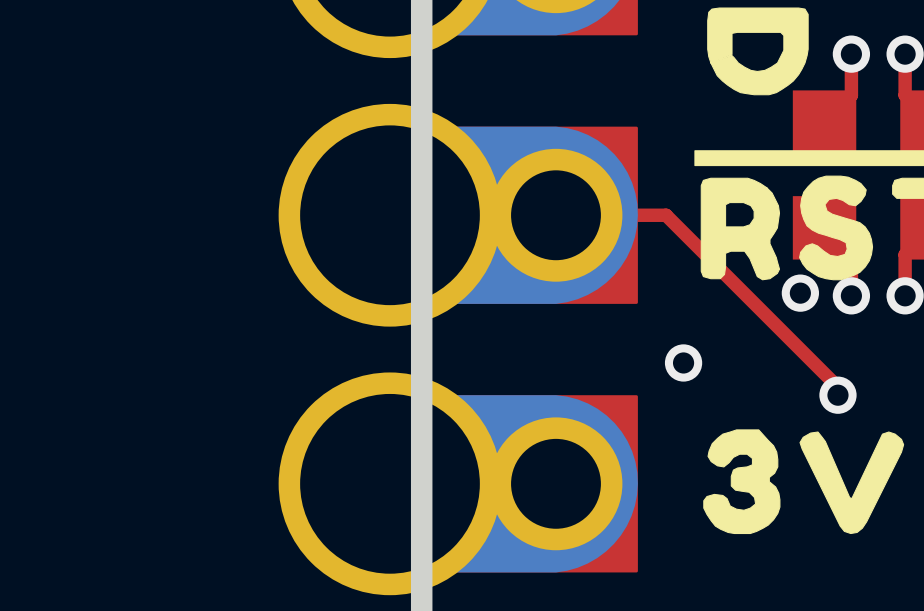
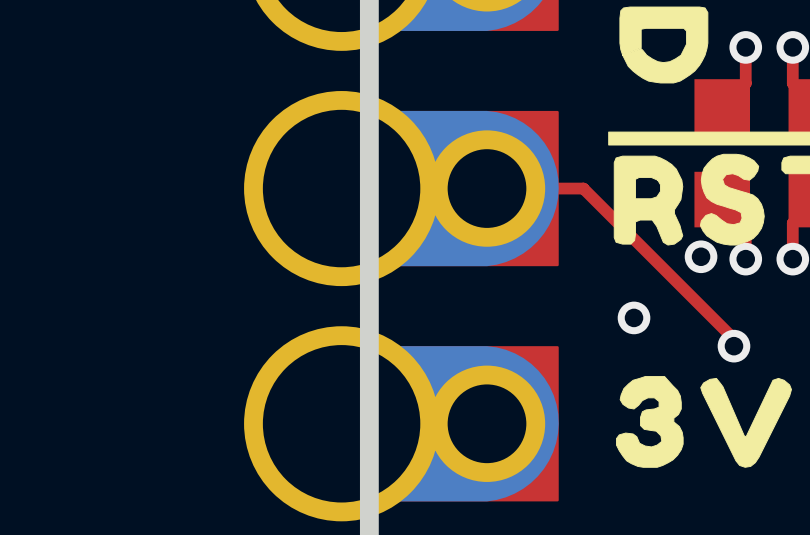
via position: (683, 362) -> (634, 317)

